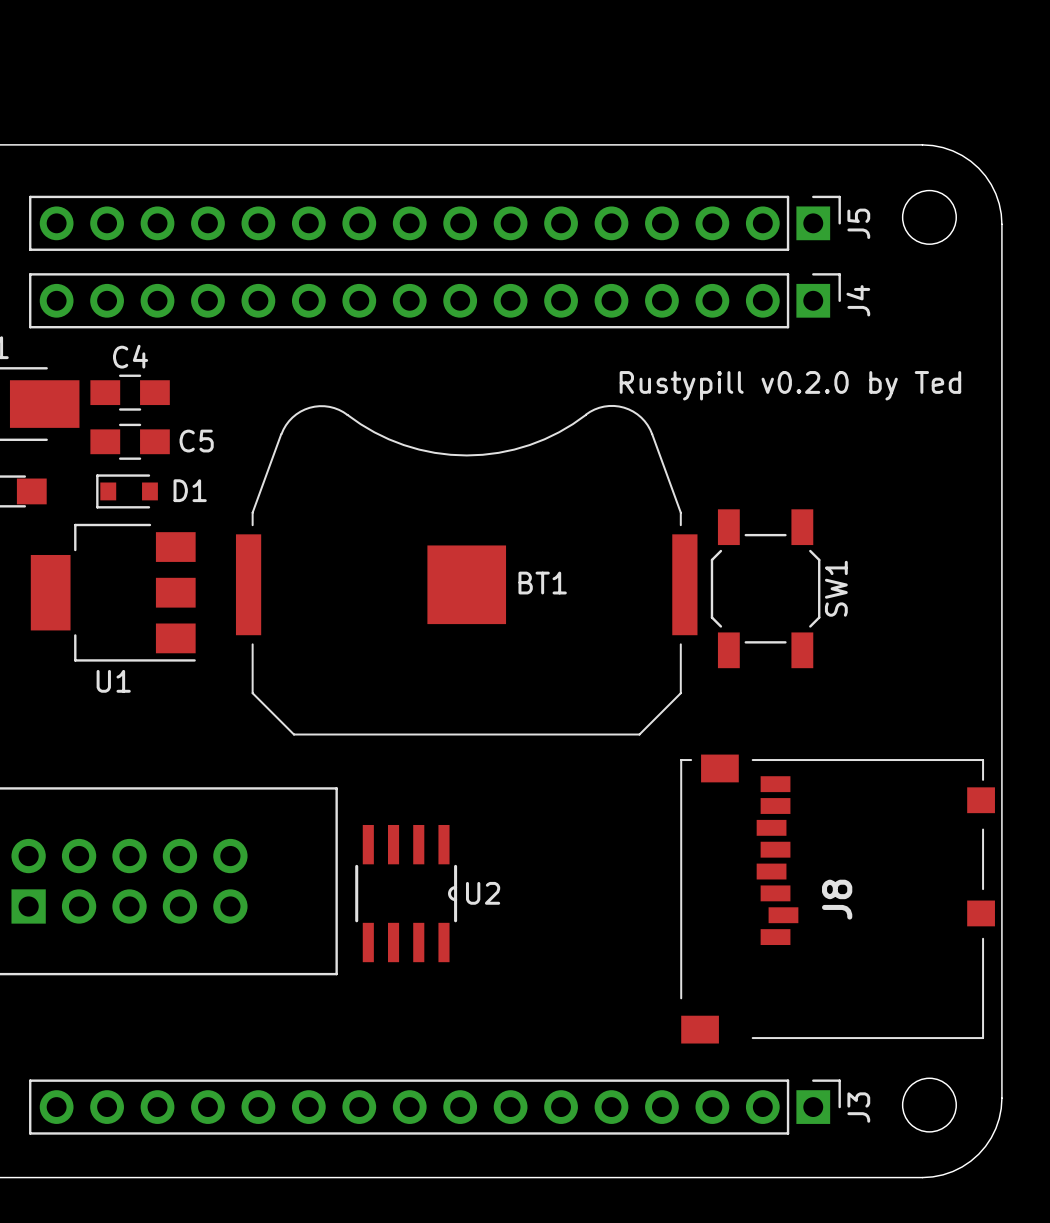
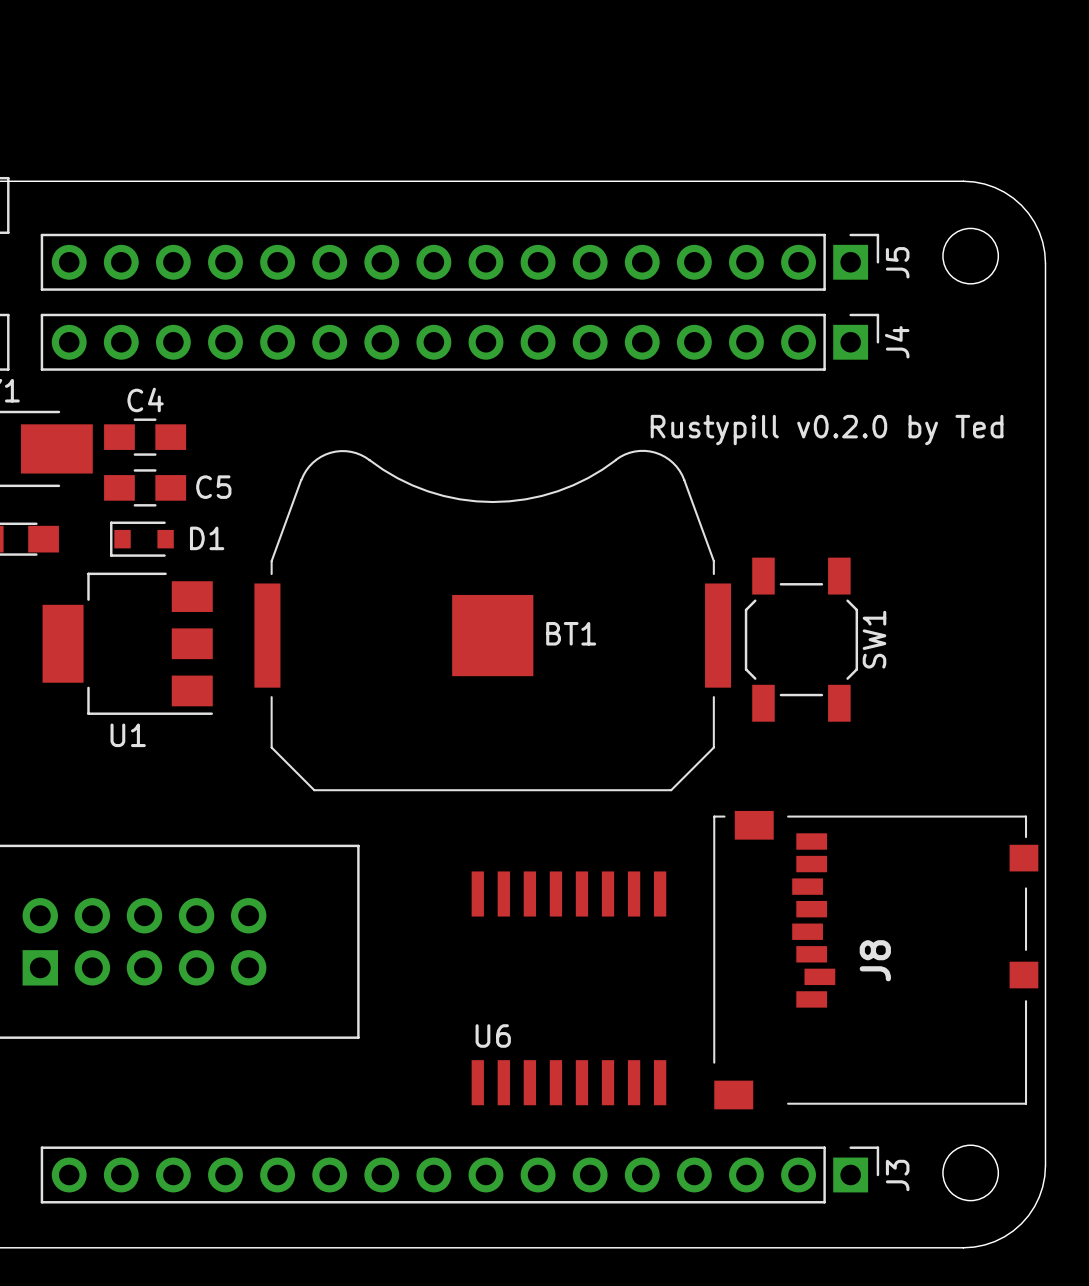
U2: (406, 893) -> none
U6: none -> (568, 988)

